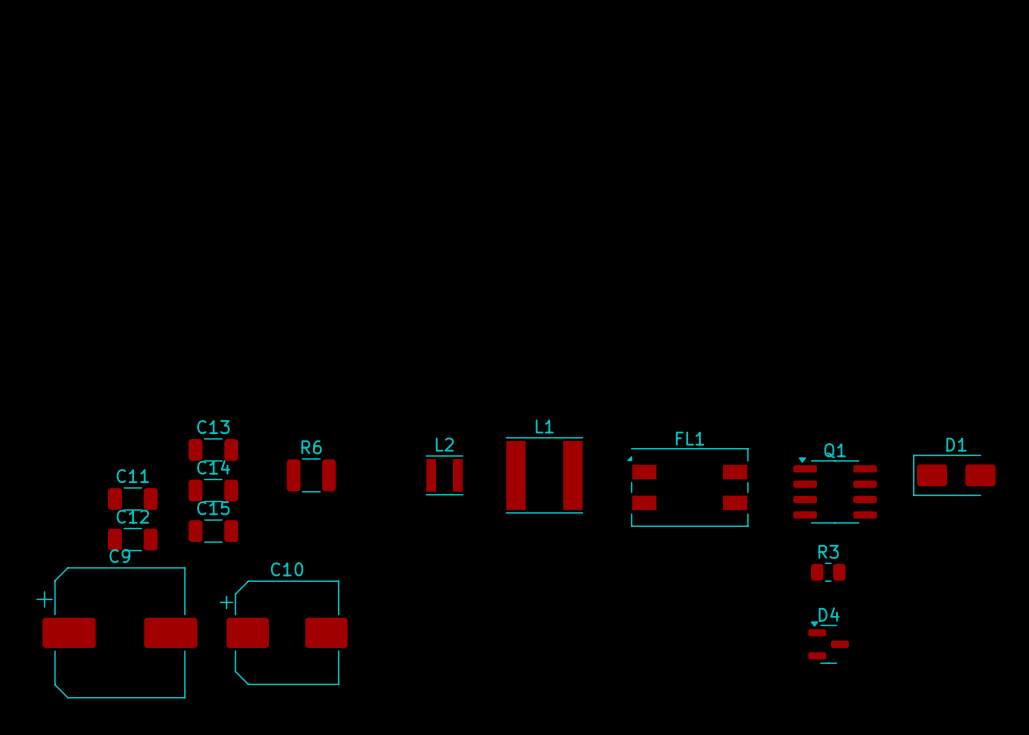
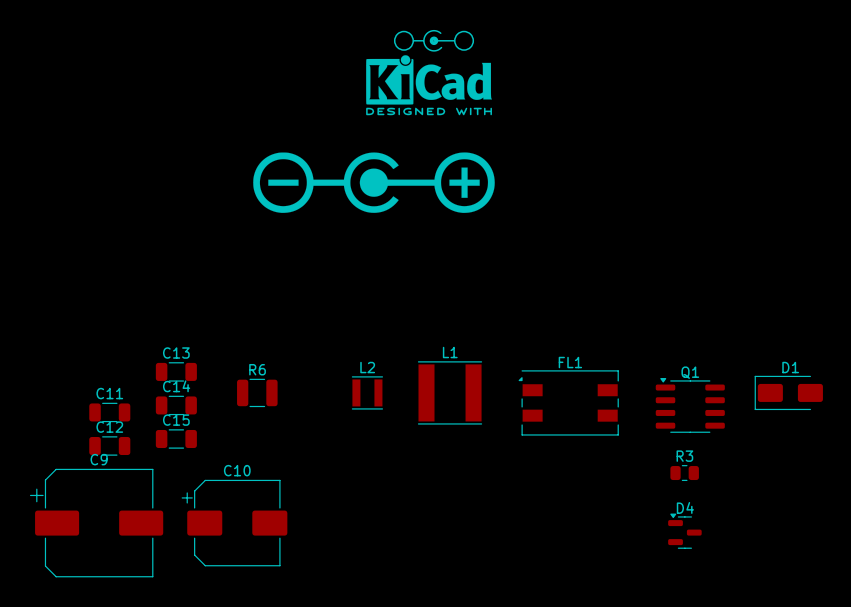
drawing: none -> [366, 29, 493, 116]
drawing: none -> [253, 152, 495, 213]

